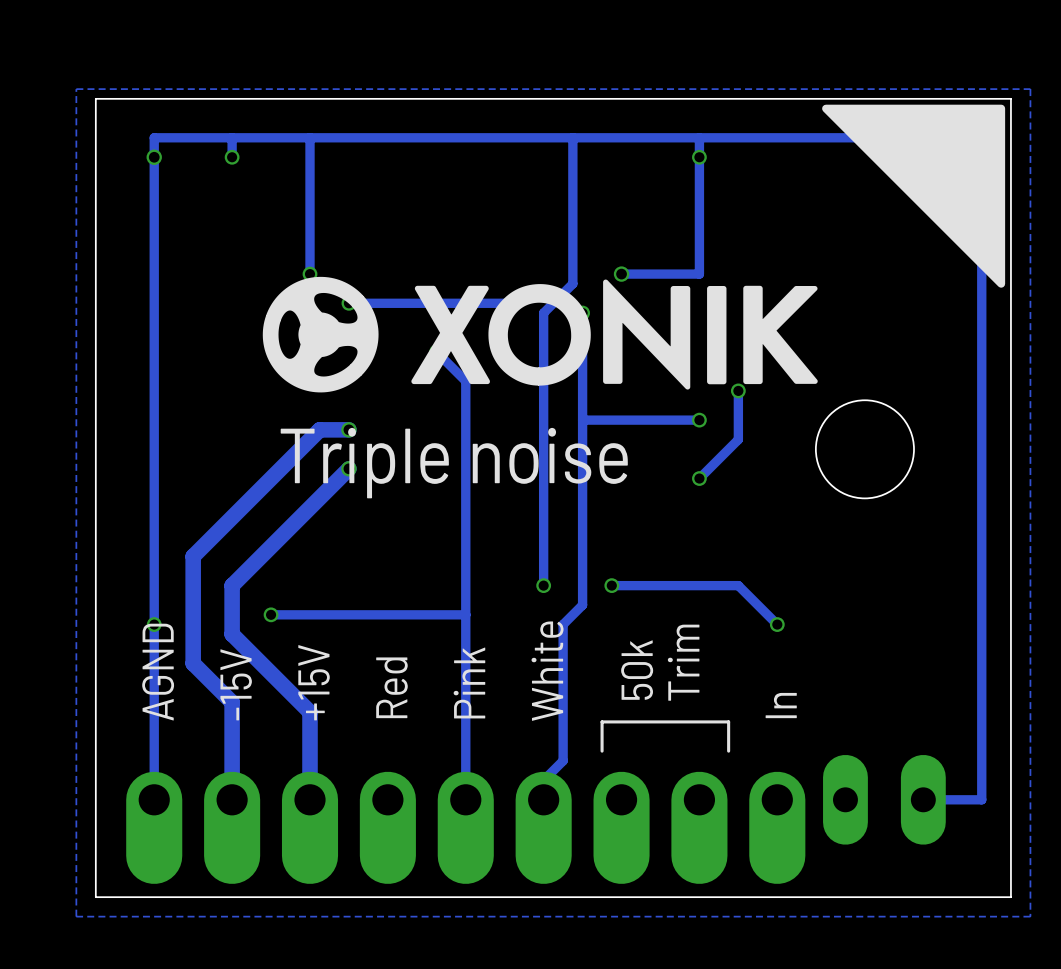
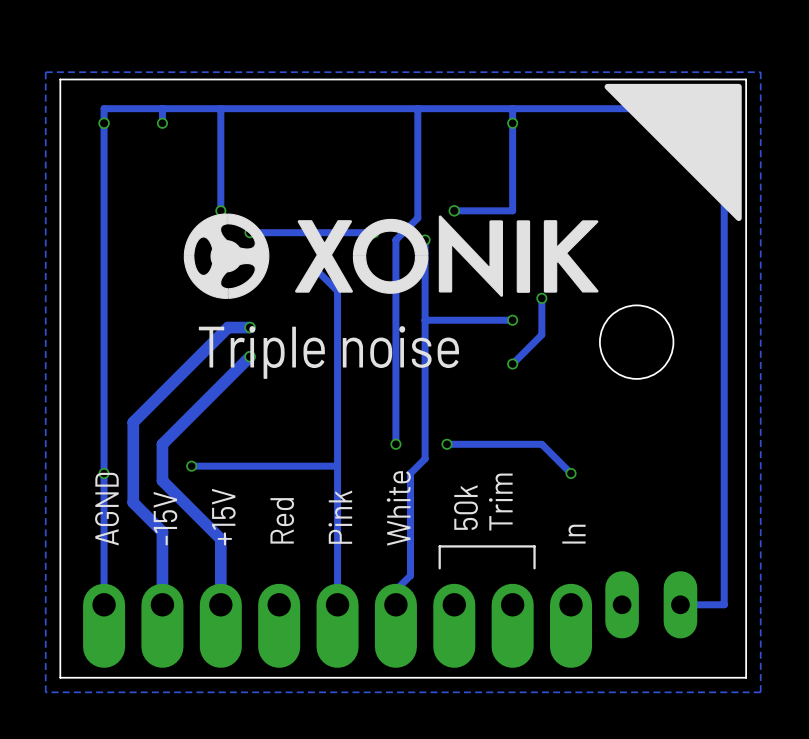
drawing: [262, 276, 490, 393] -> none
drawing: [603, 279, 818, 390] -> none
drawing shape: [488, 284, 591, 386] -> [183, 213, 599, 299]

